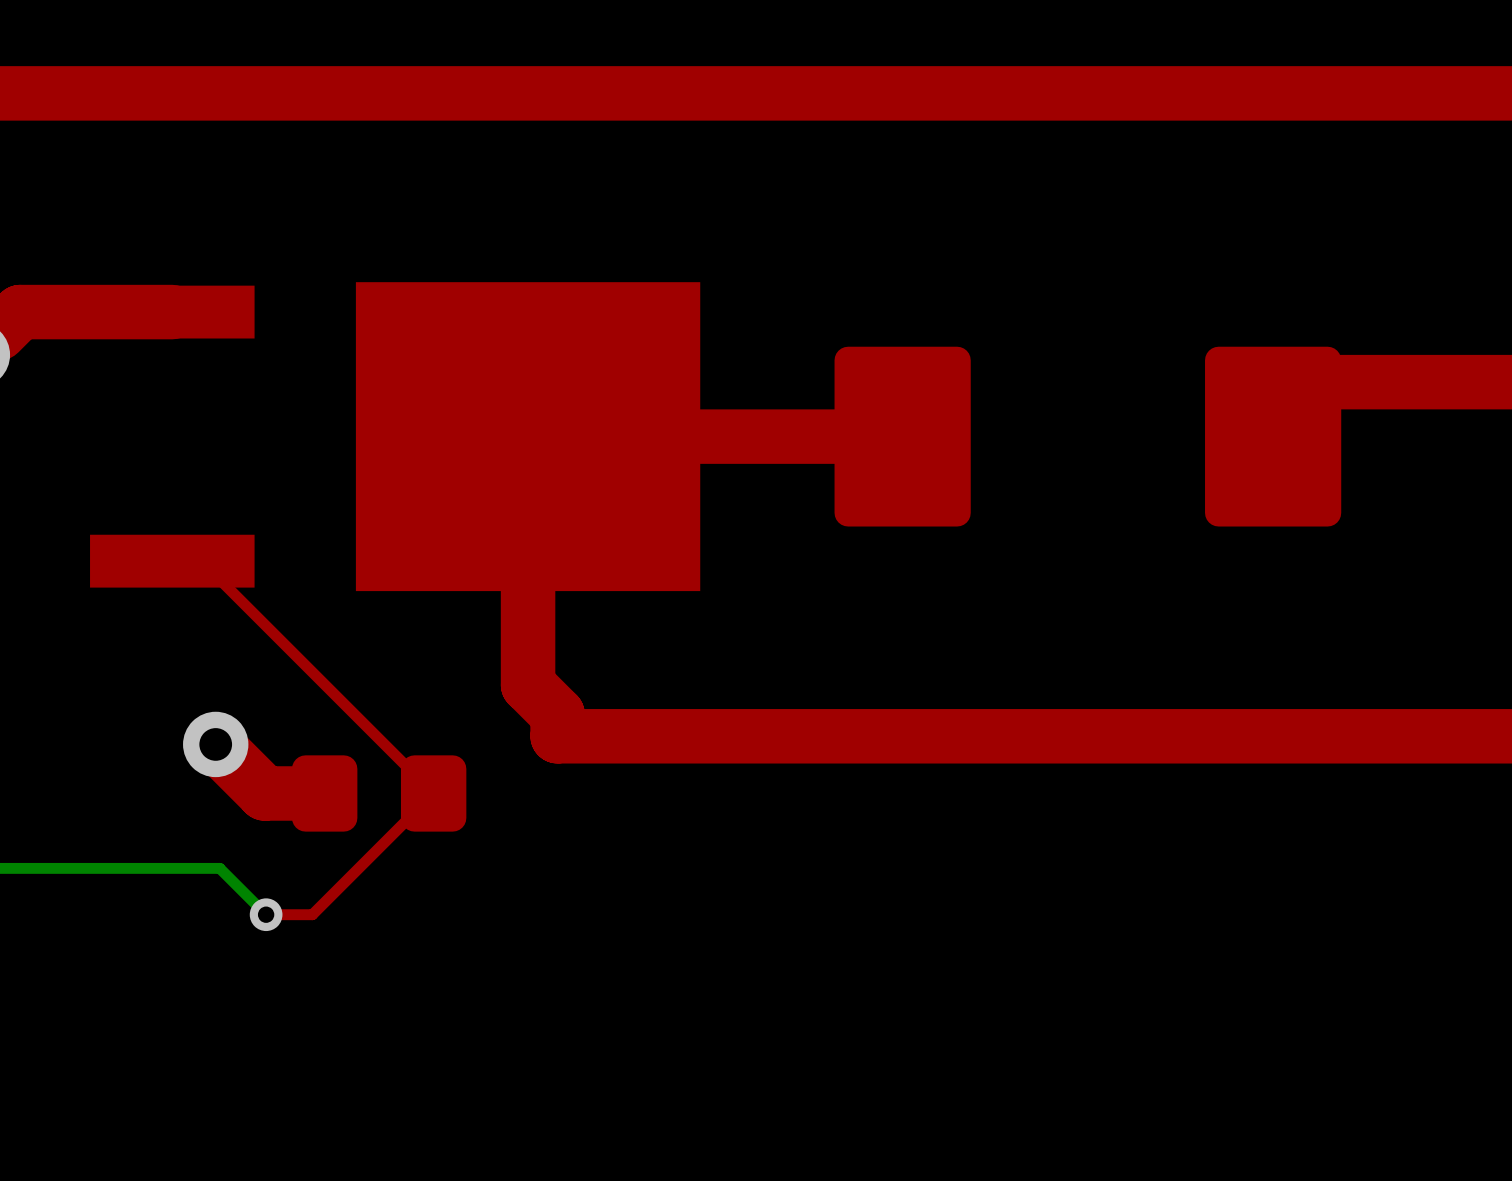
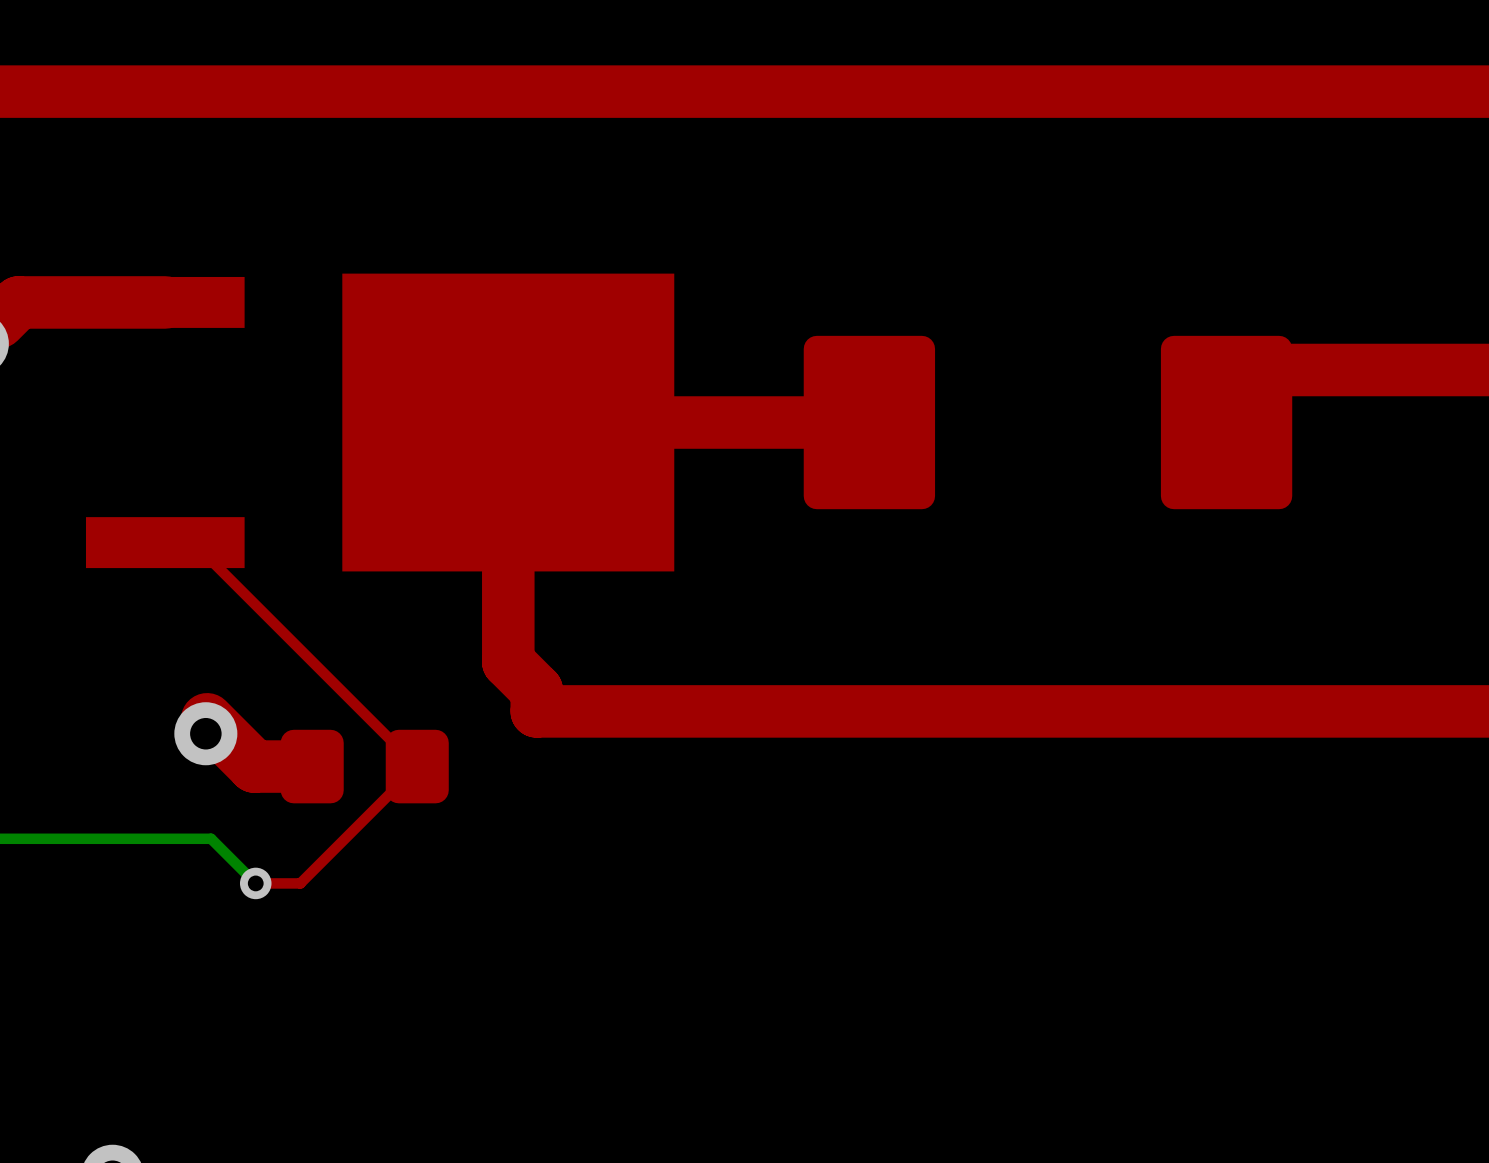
via position: (215, 744) -> (205, 733)

